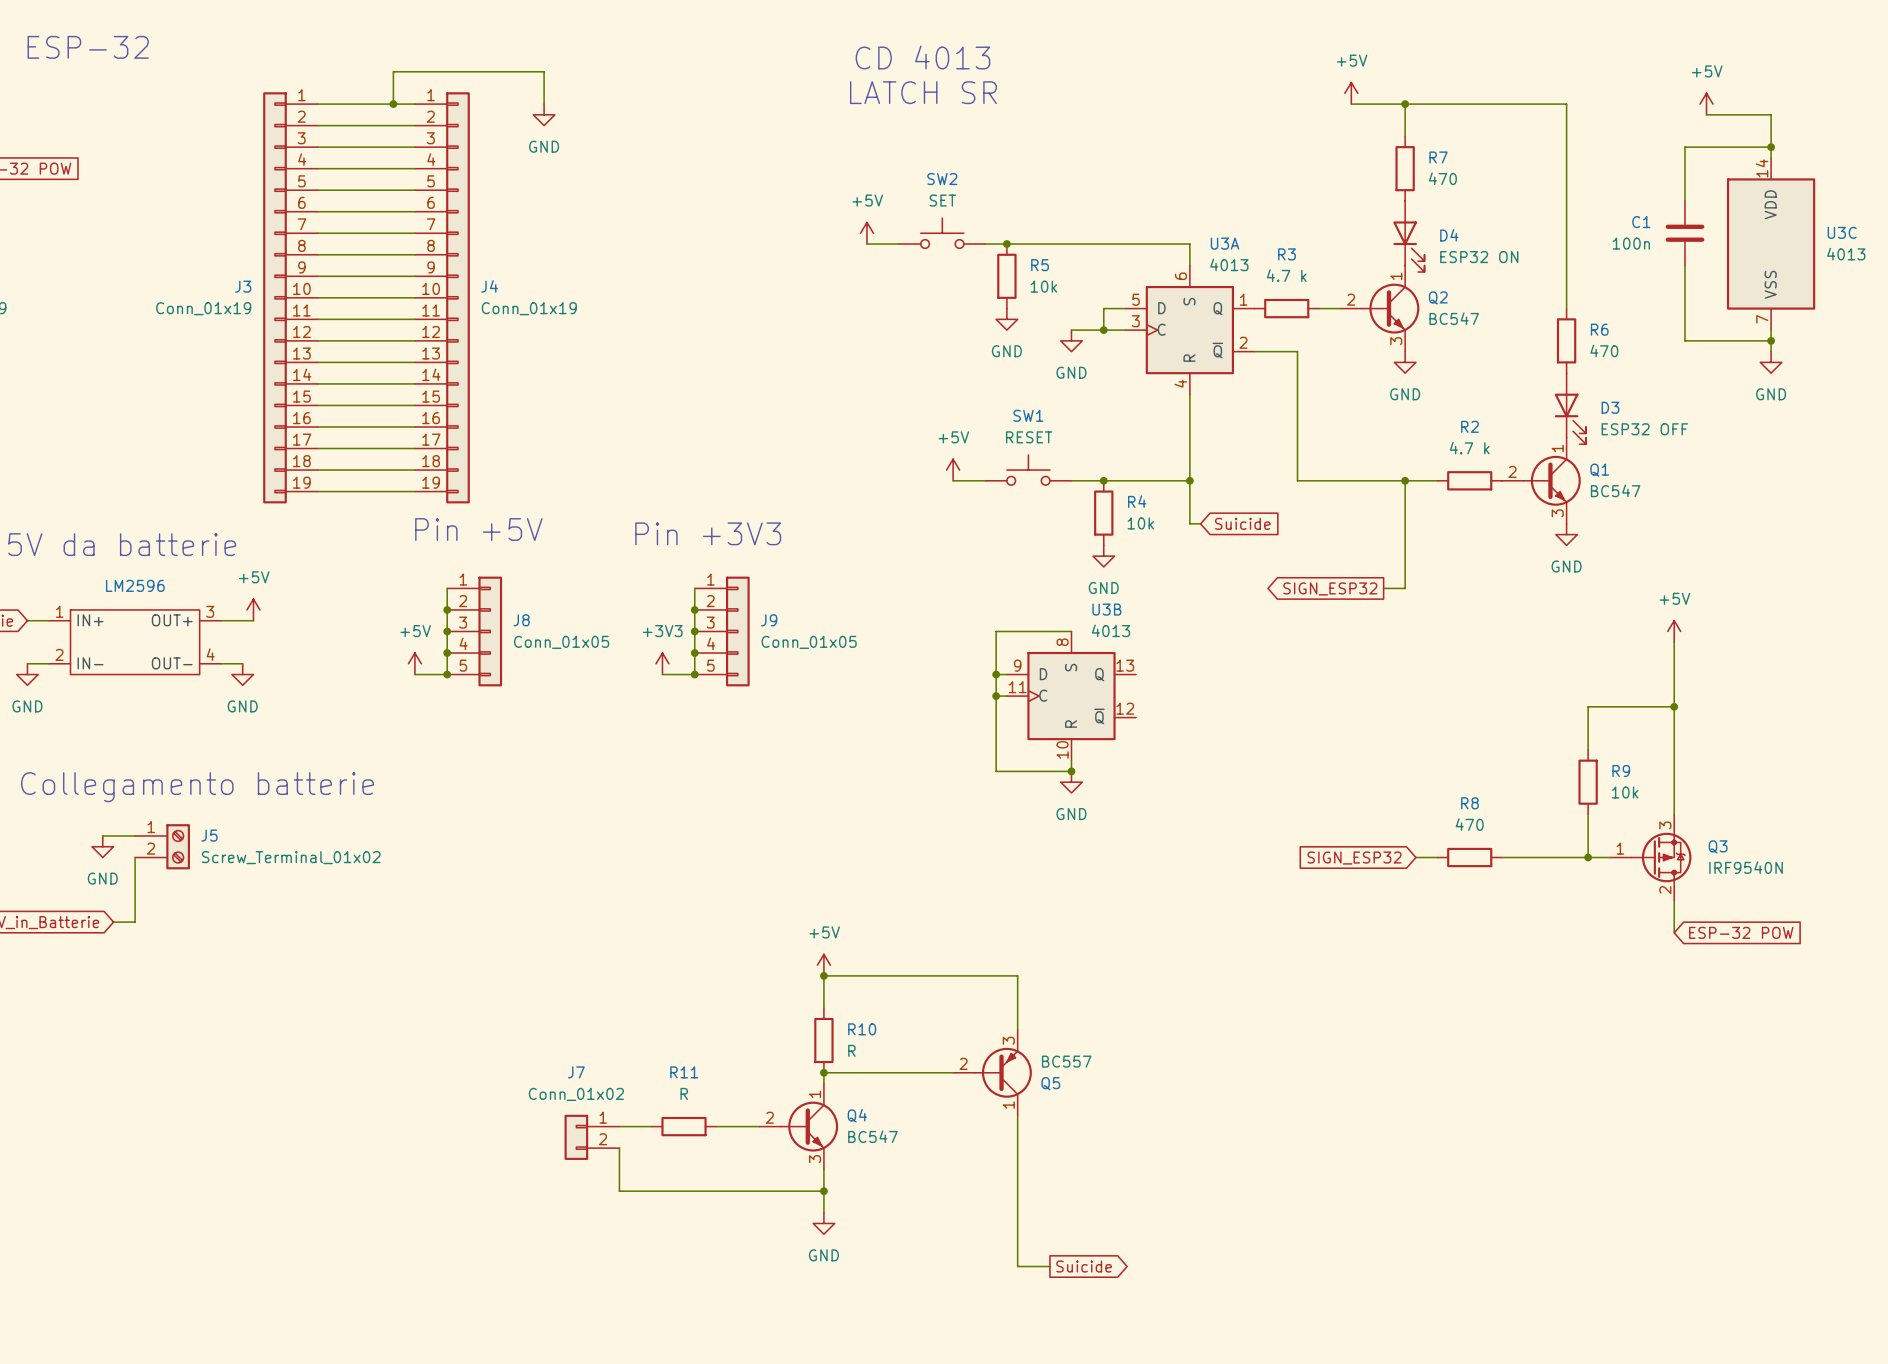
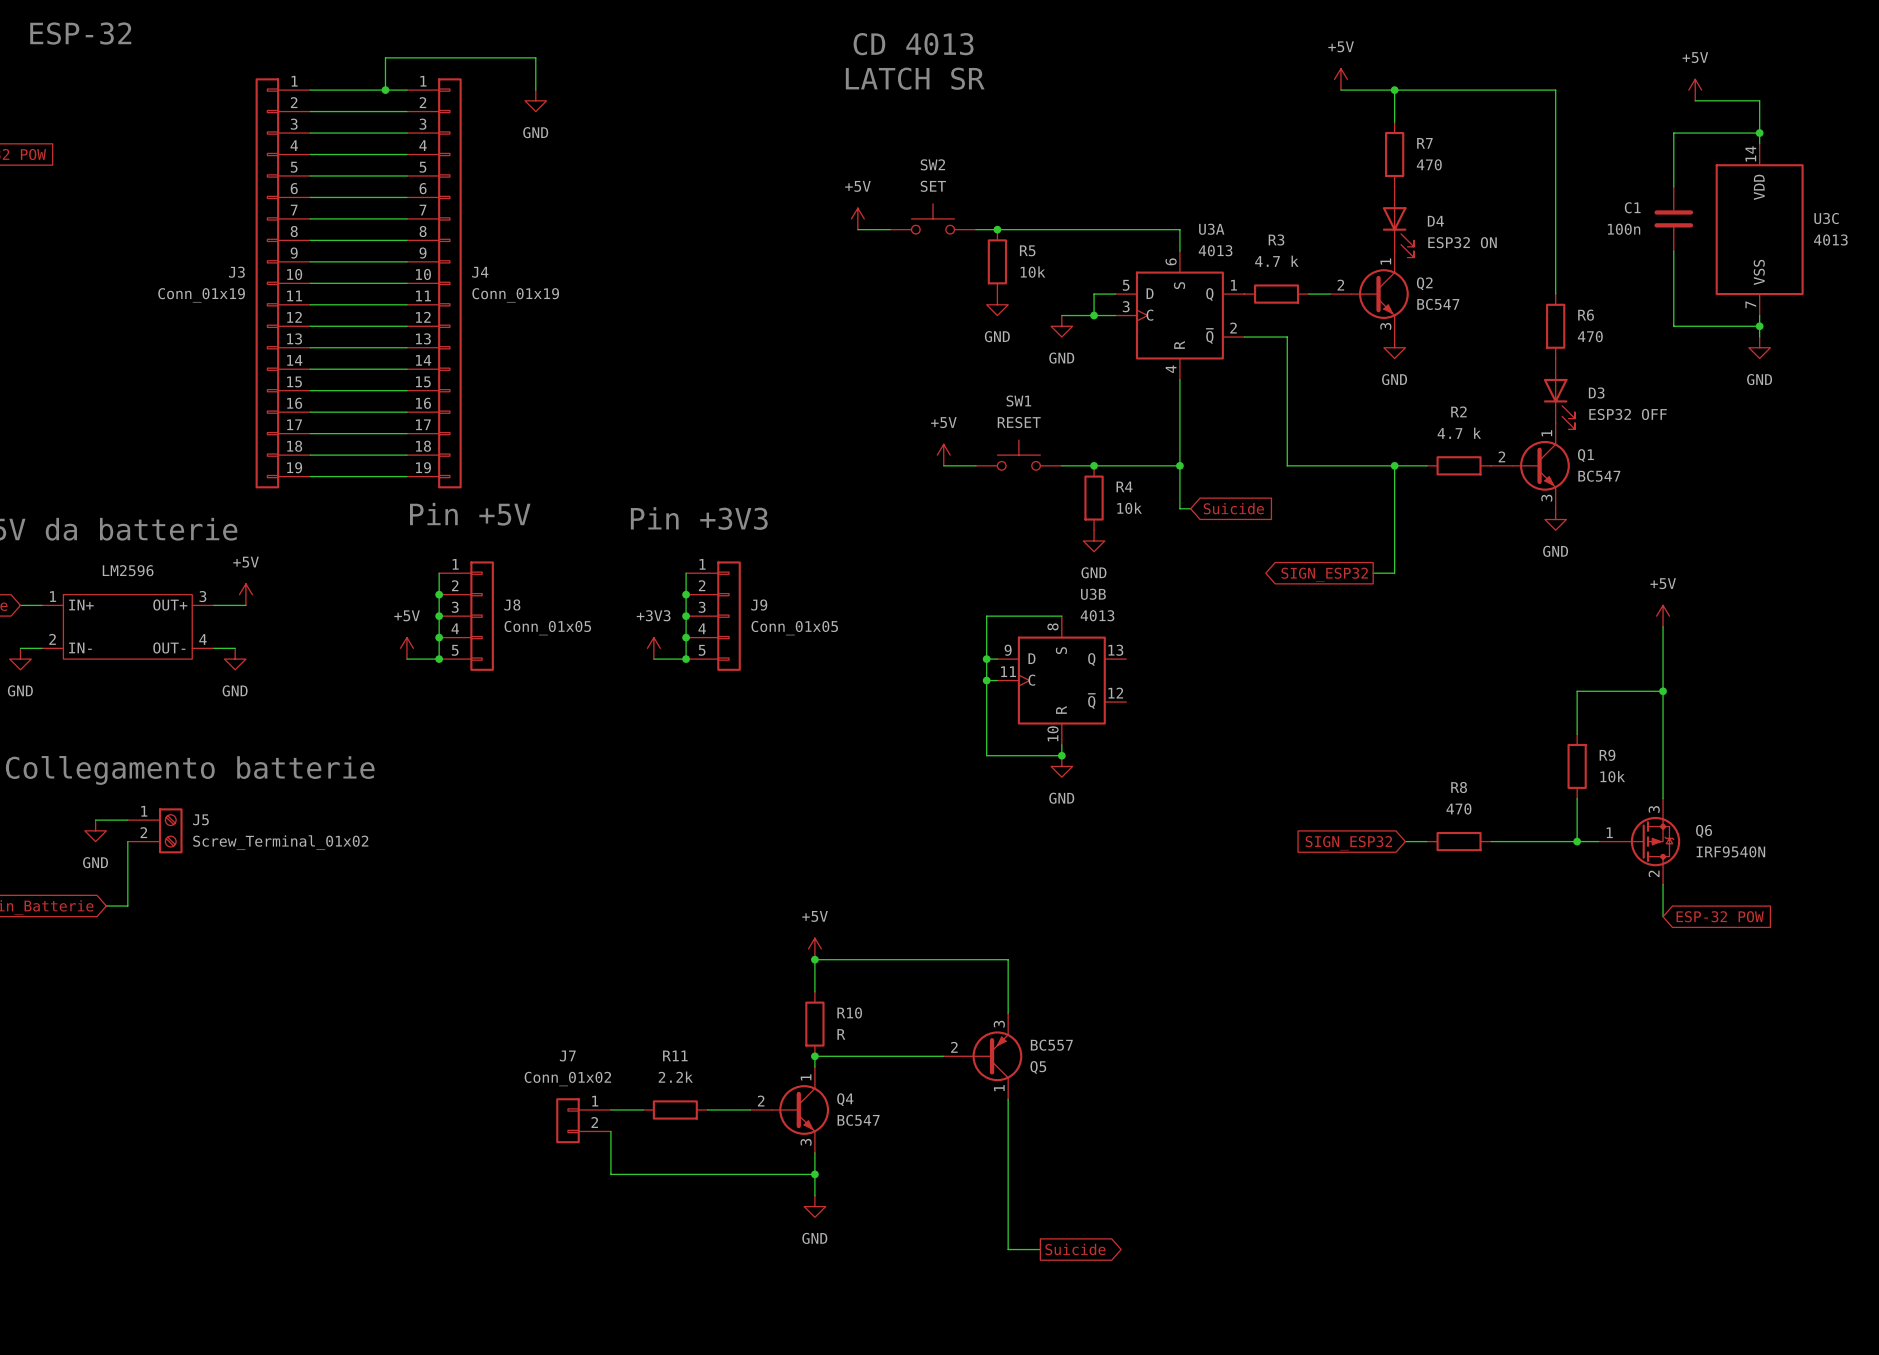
Q3 name: Q3 (1718, 846) -> Q6 (1704, 831)
R11 value: R (684, 1093) -> 2.2k (675, 1077)

